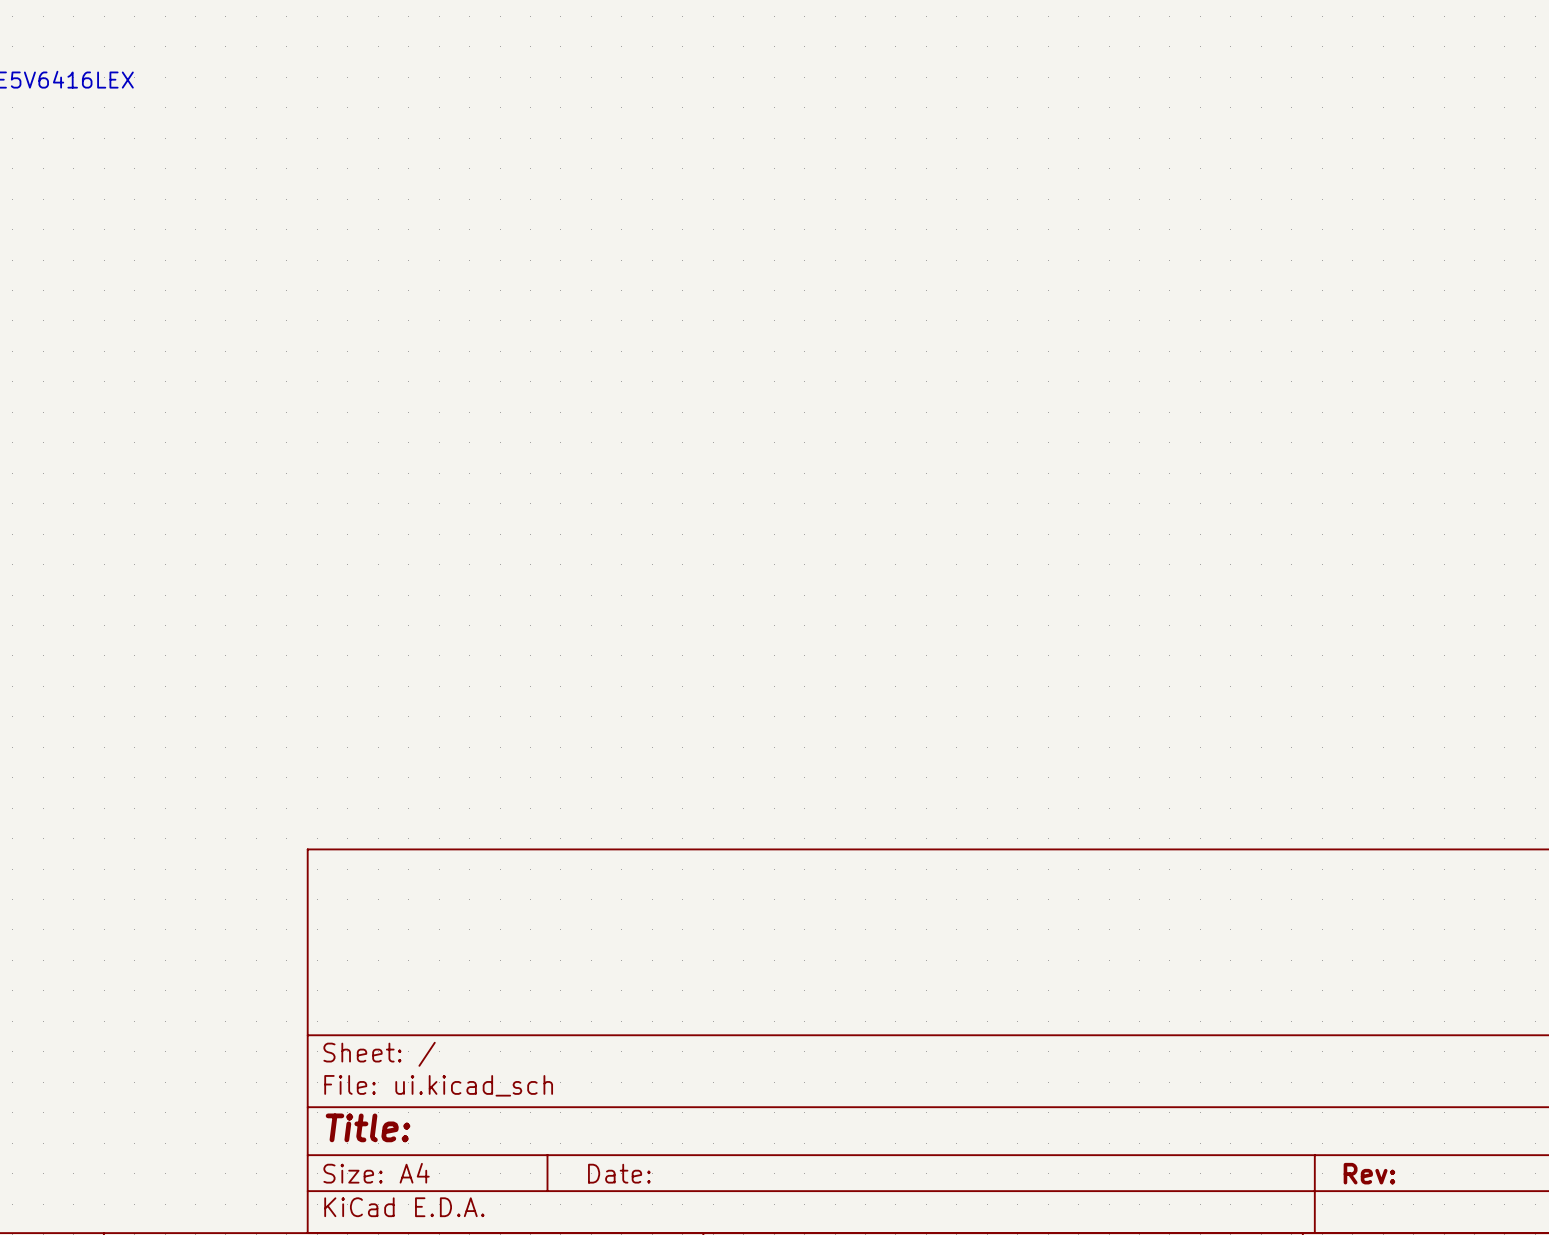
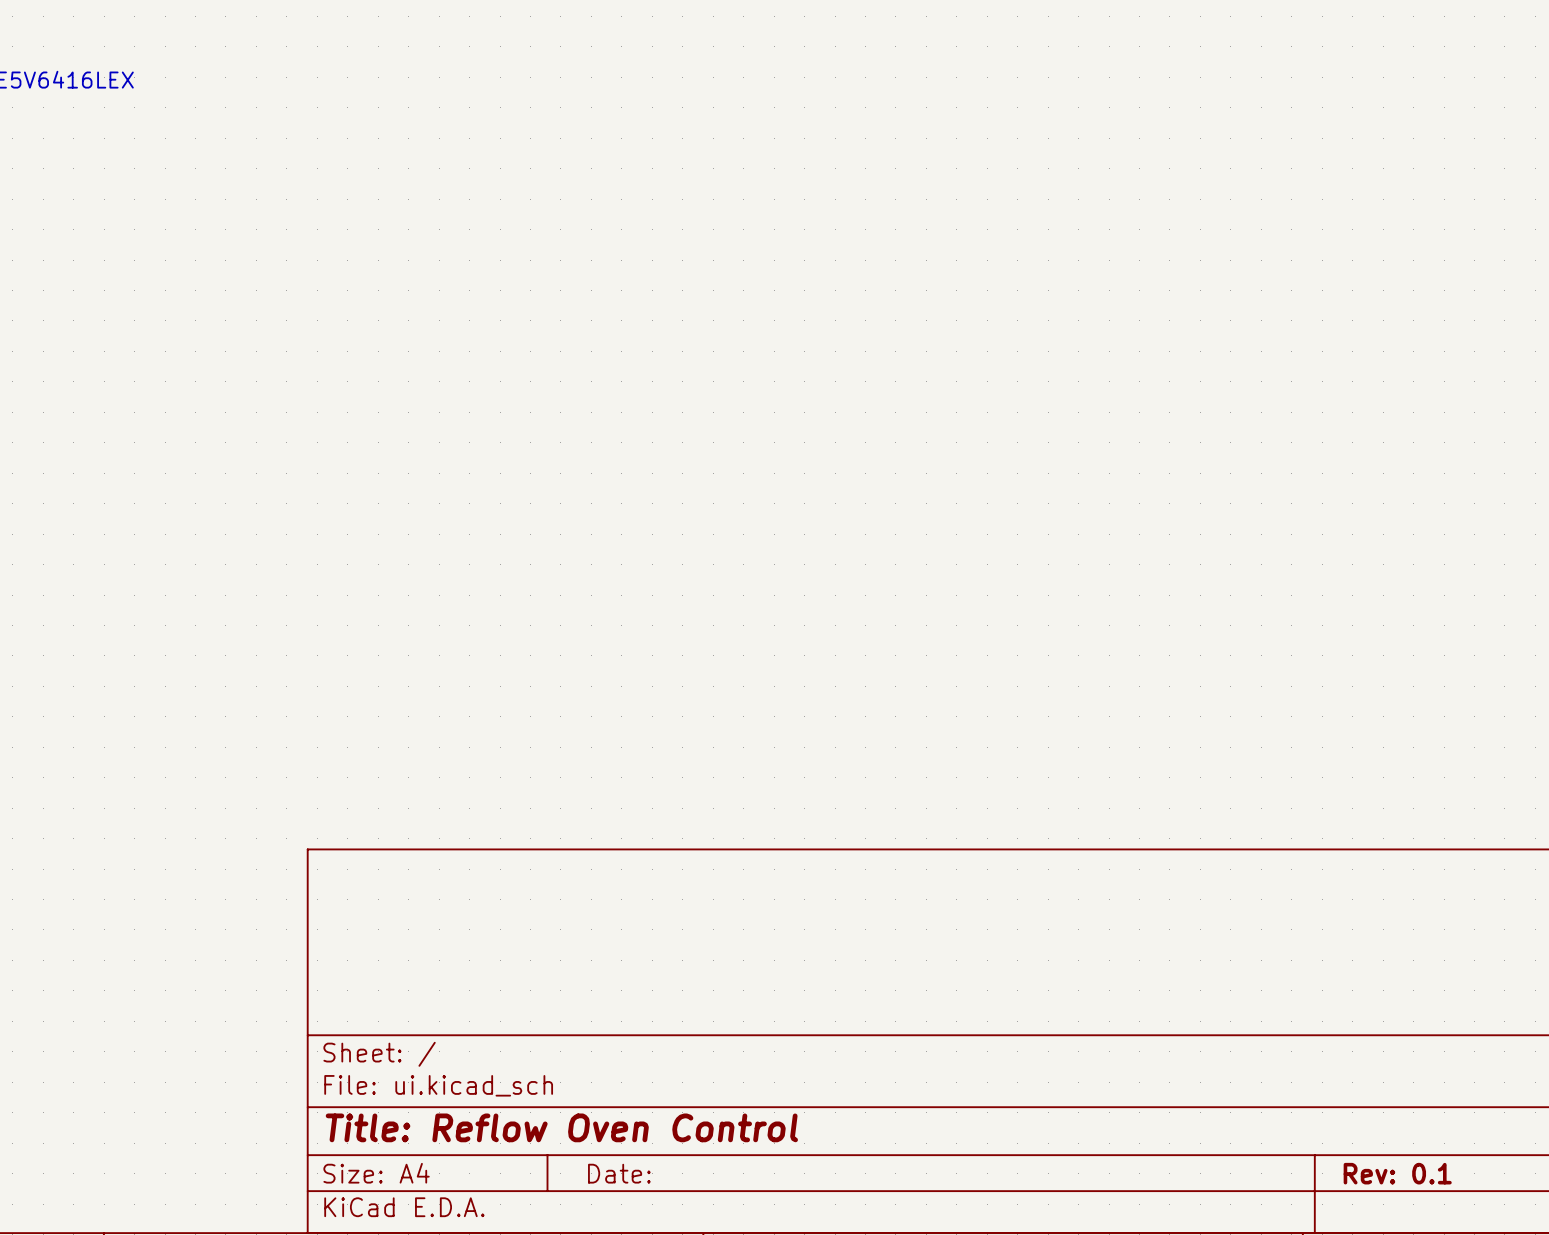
title block: Title: (368, 1127) -> Title: Reflow Oven Control (561, 1127)
title block: Rev: (1369, 1173) -> Rev: 0.1 (1397, 1173)

